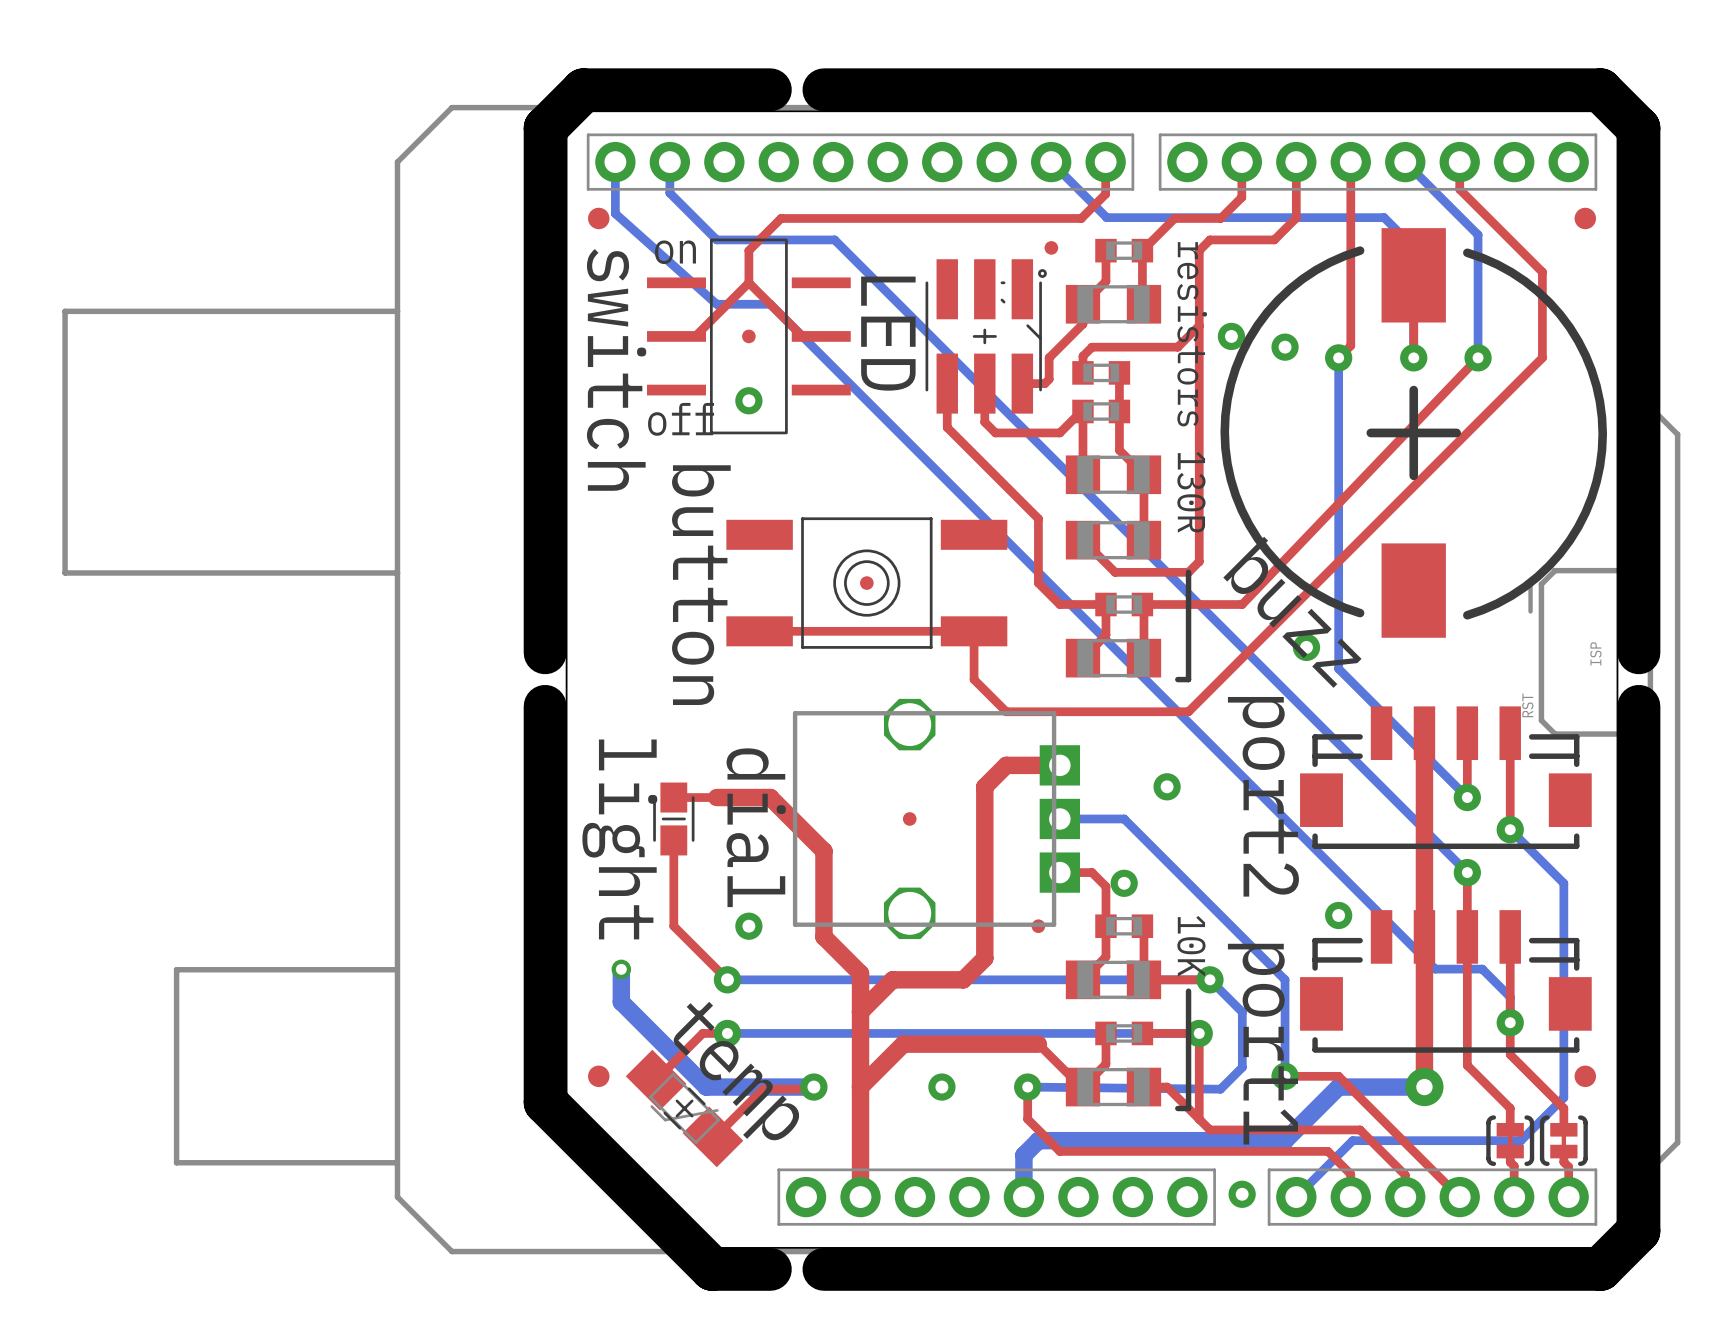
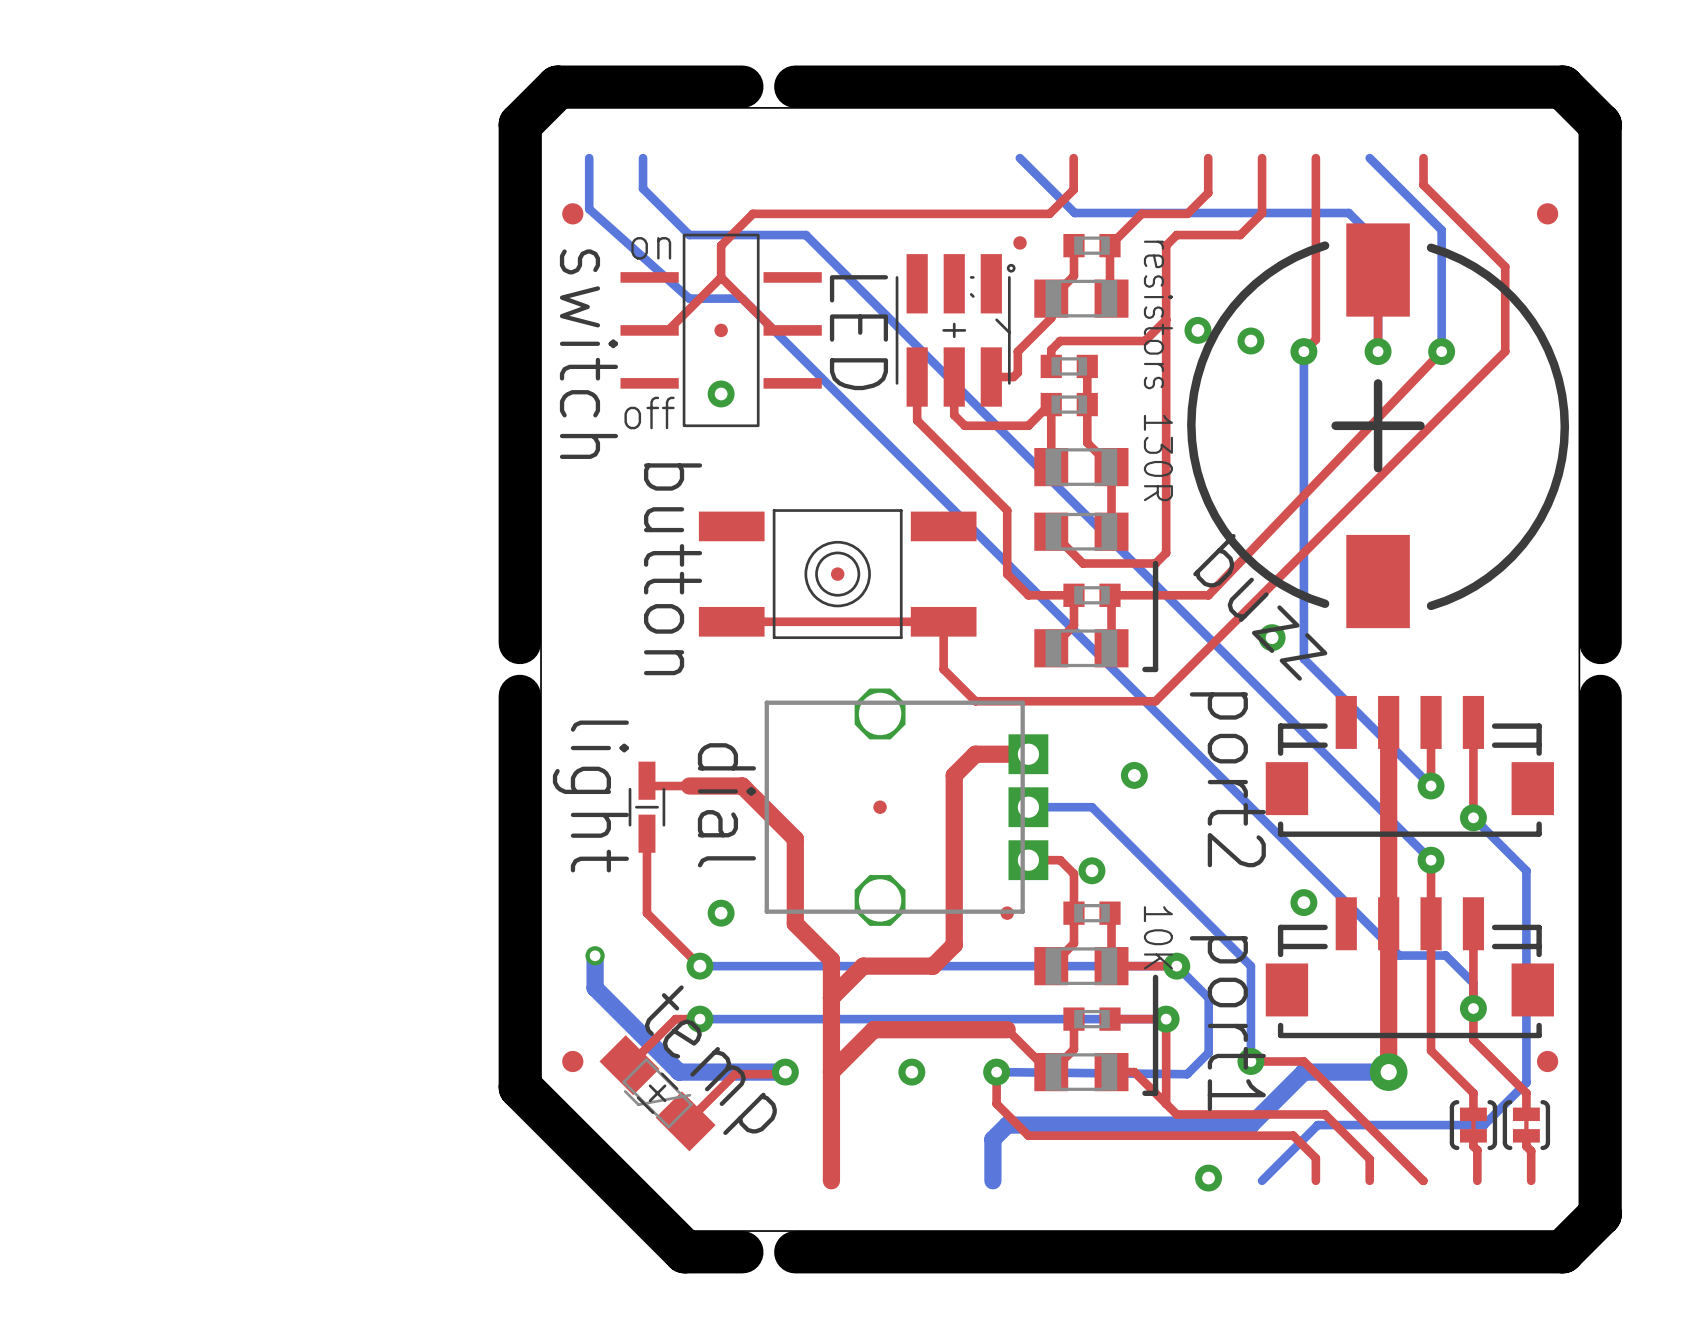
part: (871, 679) -> none
part footprint: [653, 782, 695, 856] -> [628, 761, 666, 853]
text position: light (619, 839) -> light (590, 796)

